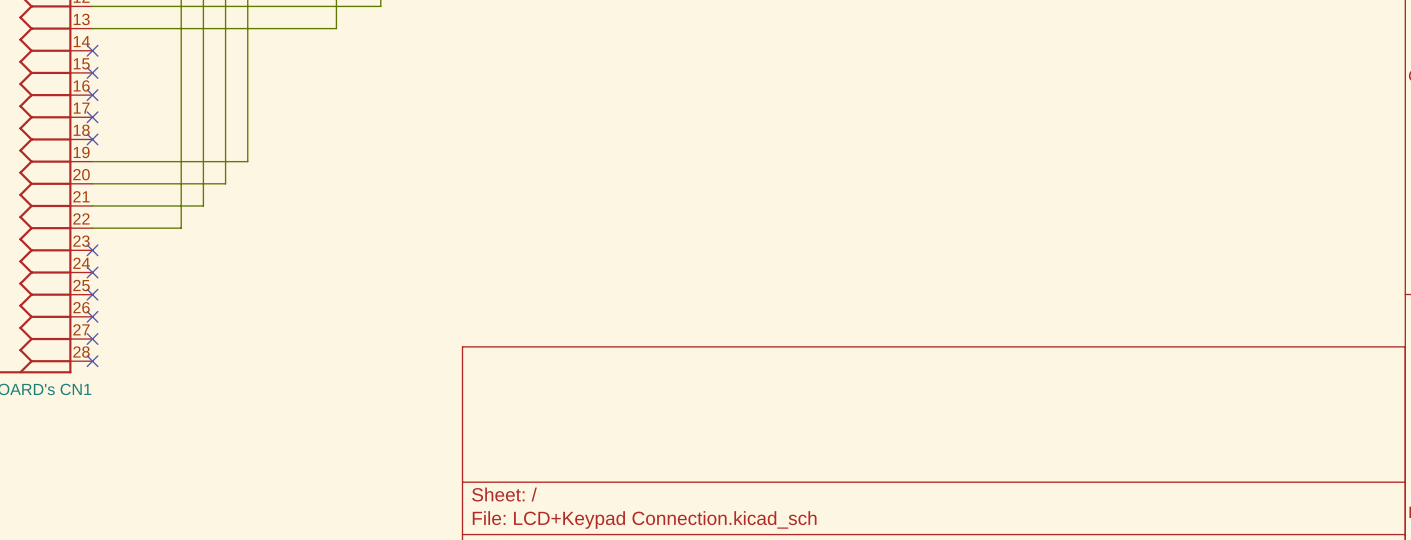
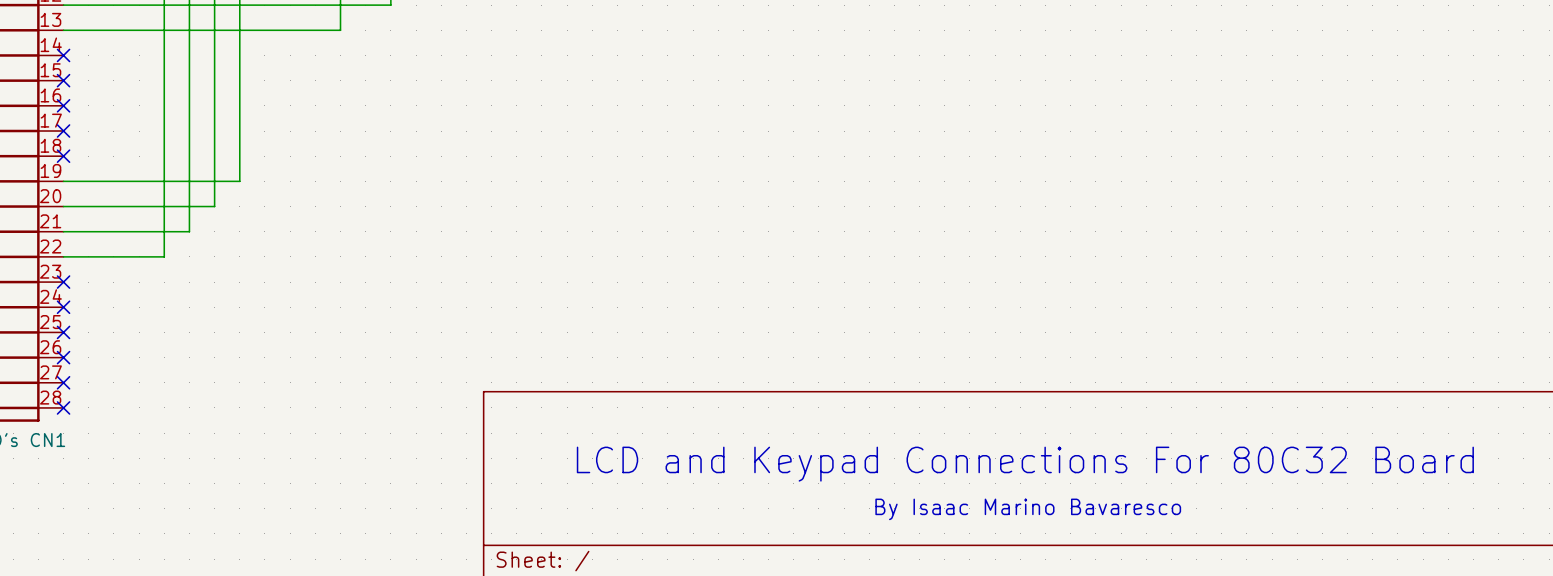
text: none -> LCD and Keypad Connections For 80C32 Board (1025, 464)
text: none -> By Isaac Marino Bavaresco (1028, 509)

